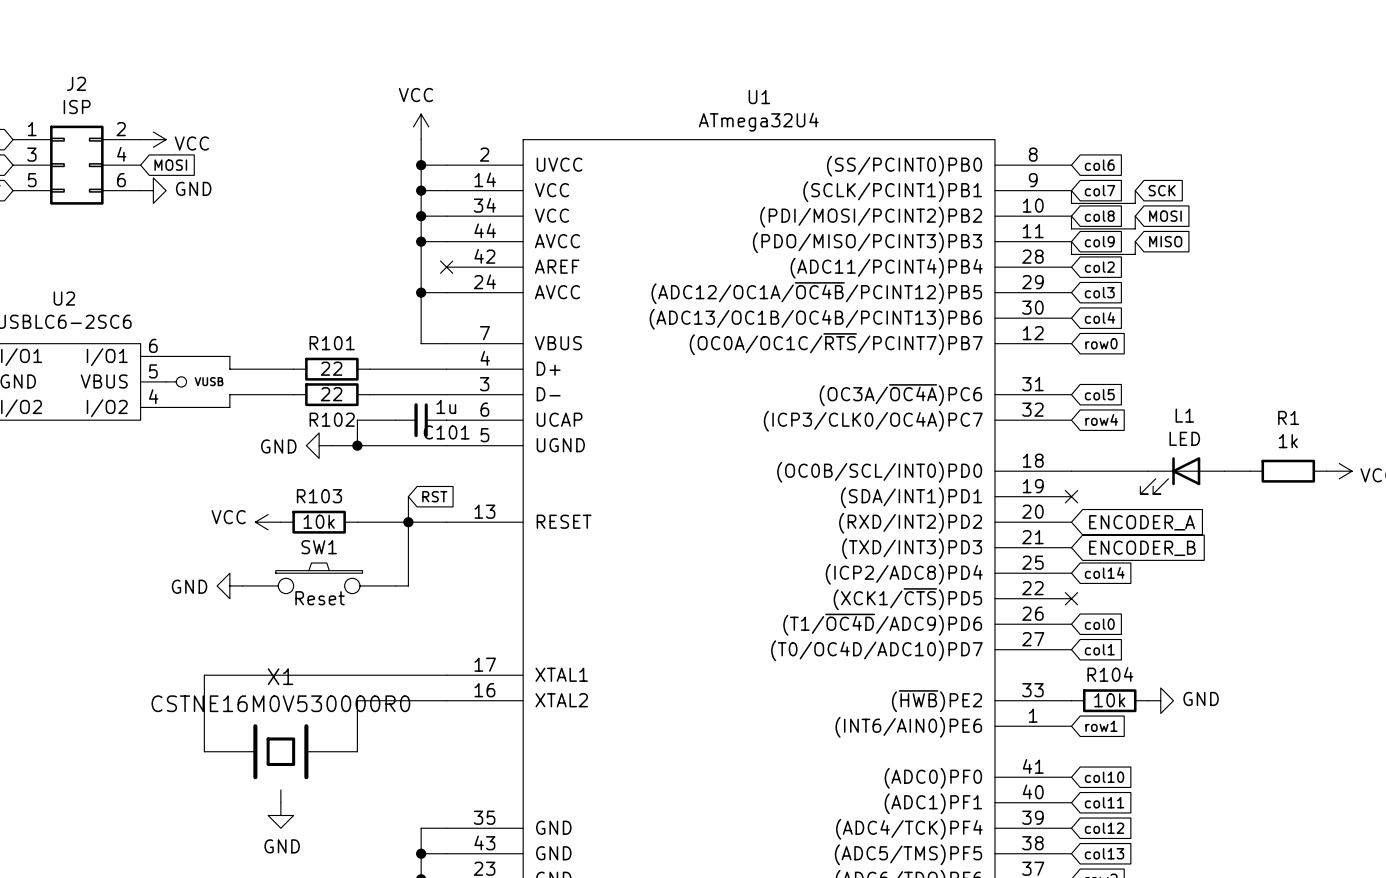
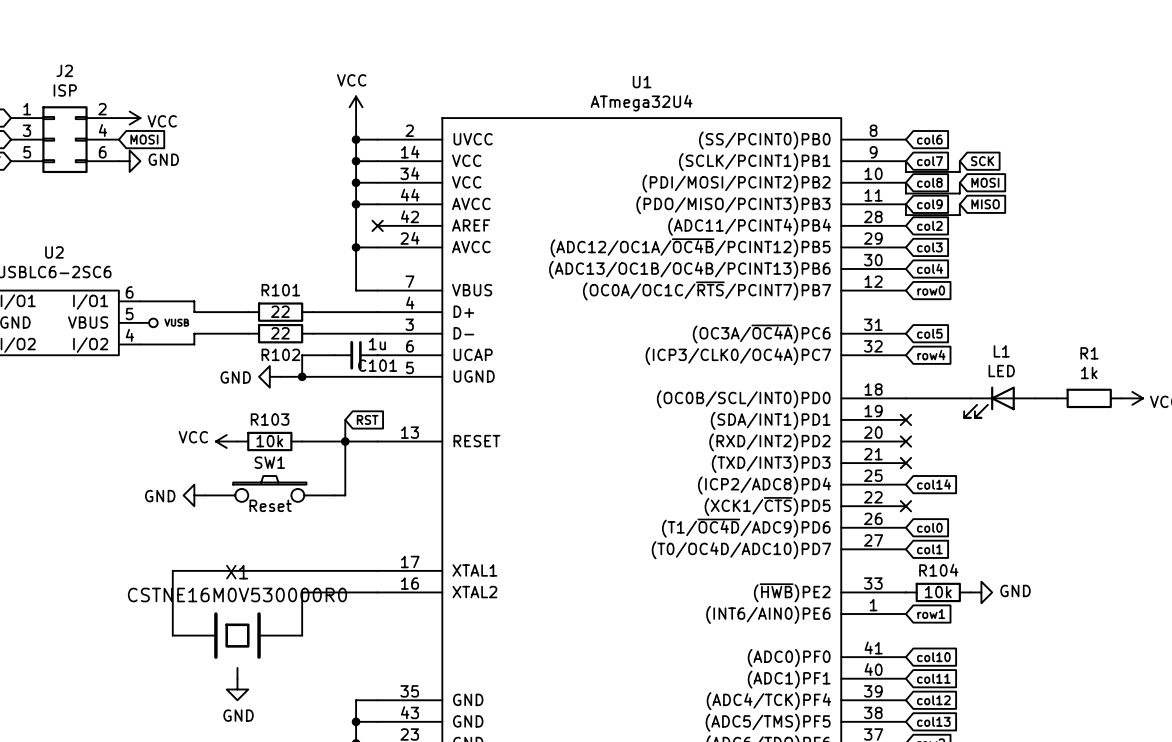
no-connect mark: none -> (905, 441)
global label: ENCODER_A (1142, 522) -> none
no-connect mark: none -> (905, 463)
global label: ENCODER_B (1142, 548) -> none

